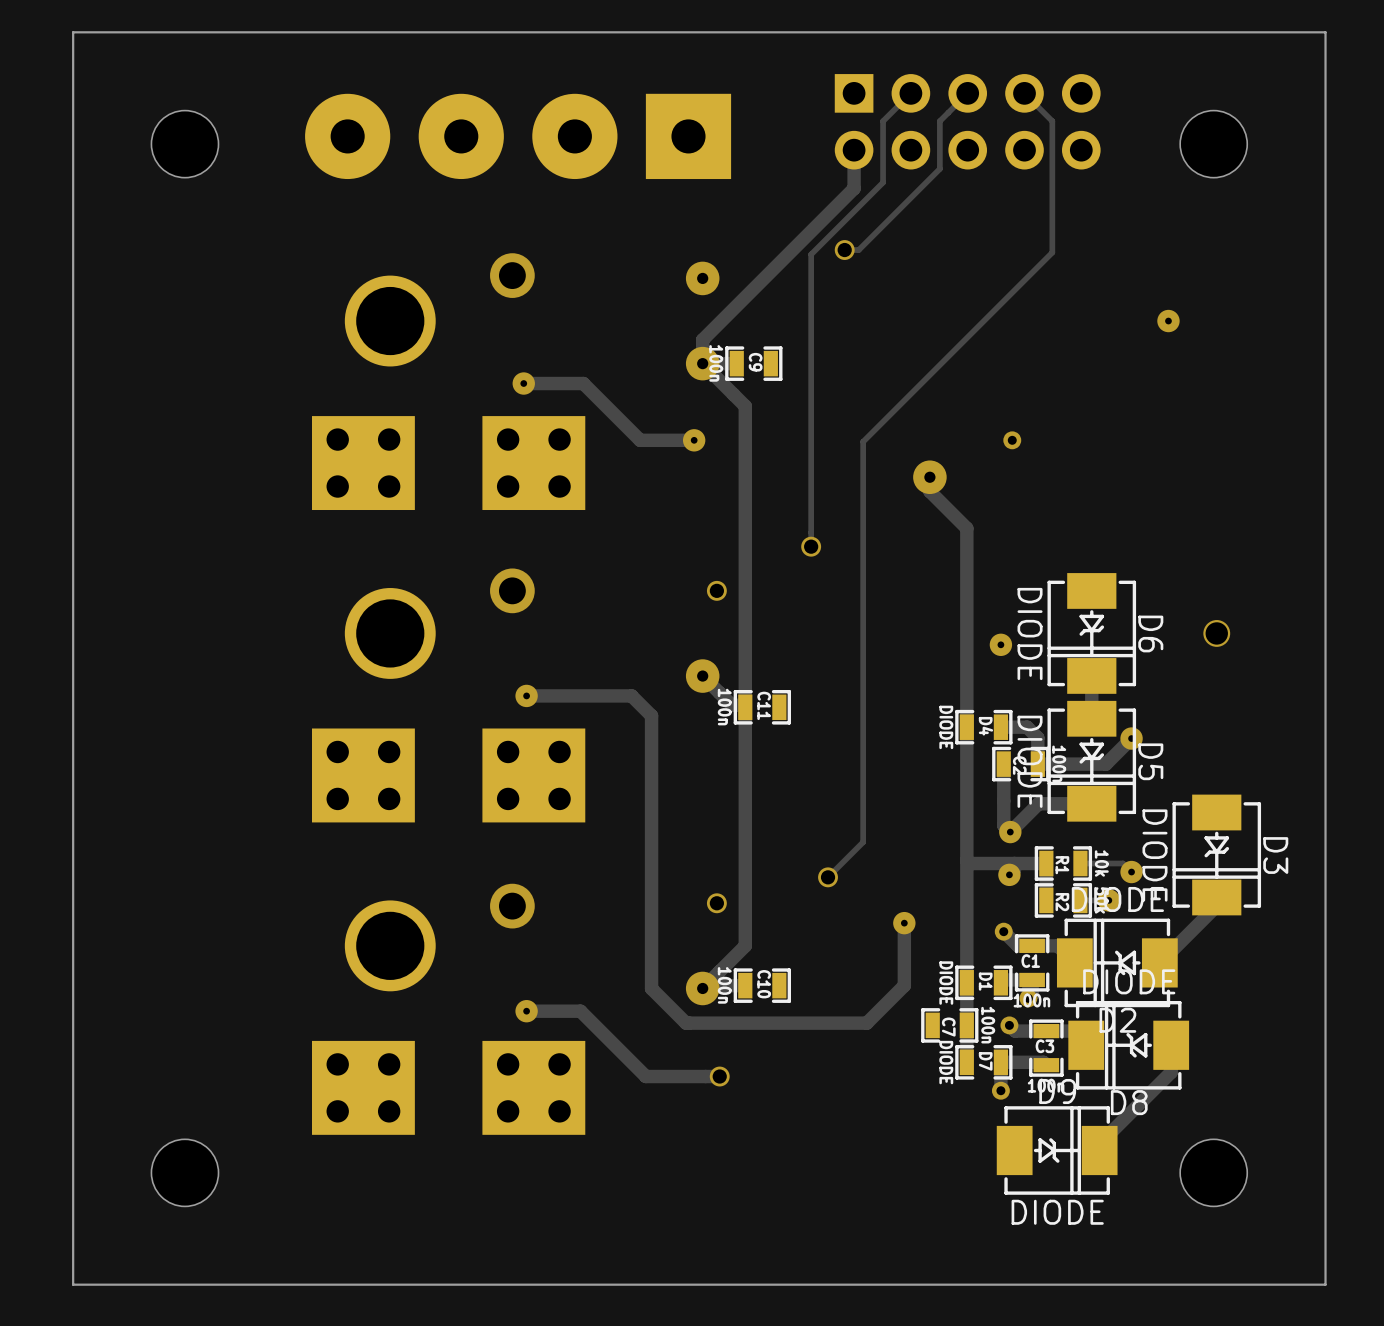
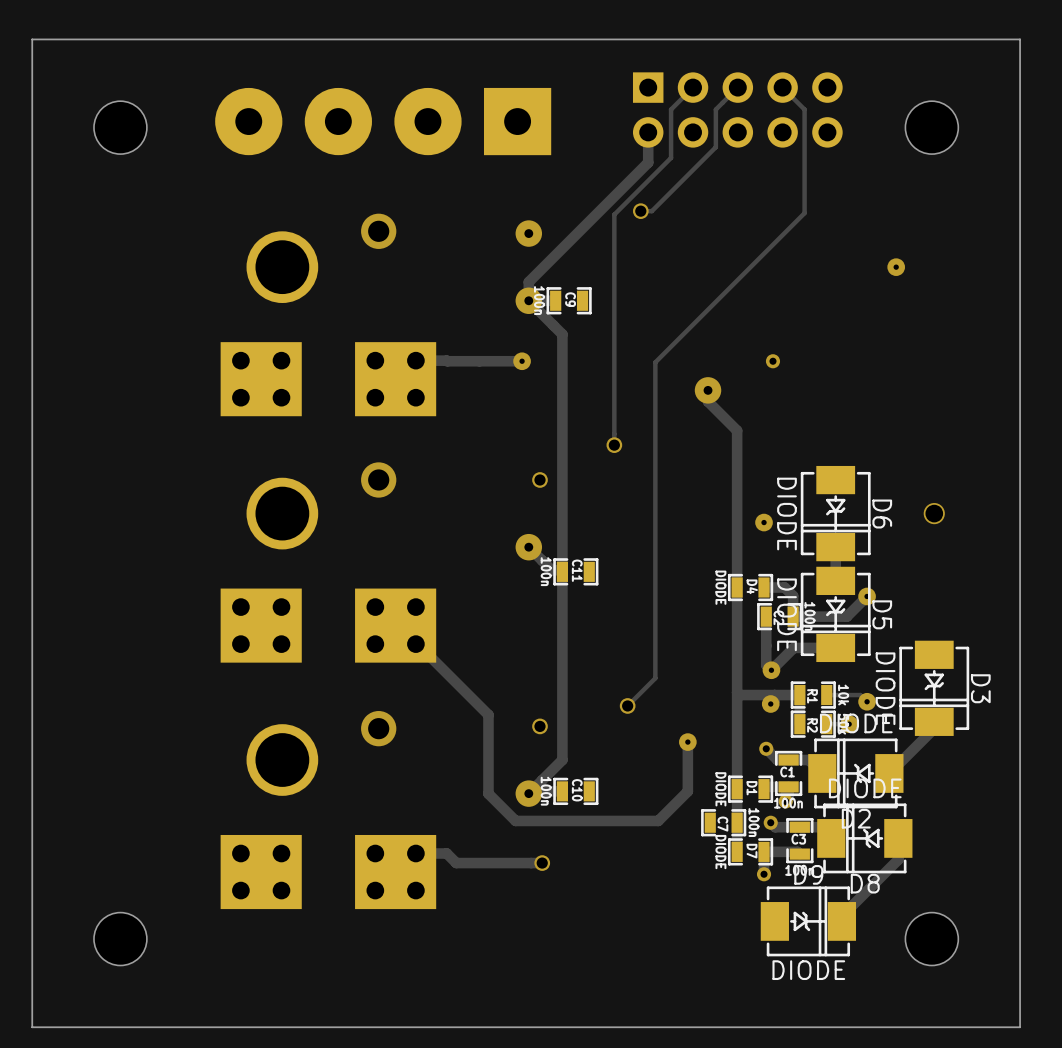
track: (523, 383) (583, 383) (640, 440) -> (415, 360) (479, 361)
via: (523, 383) -> none
track: (526, 695) (631, 695) (651, 715) (651, 888) -> (415, 644) (488, 714)
via: (526, 695) -> none
track: (526, 1011) (580, 1011) (645, 1076) -> (415, 853) (446, 853) (456, 863) (483, 863)
via: (526, 1011) -> none

